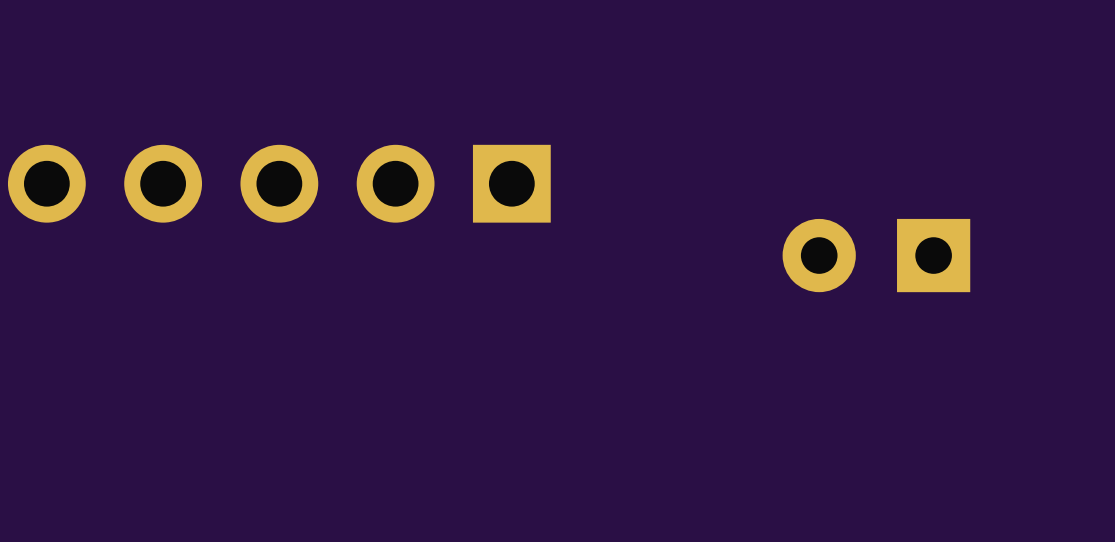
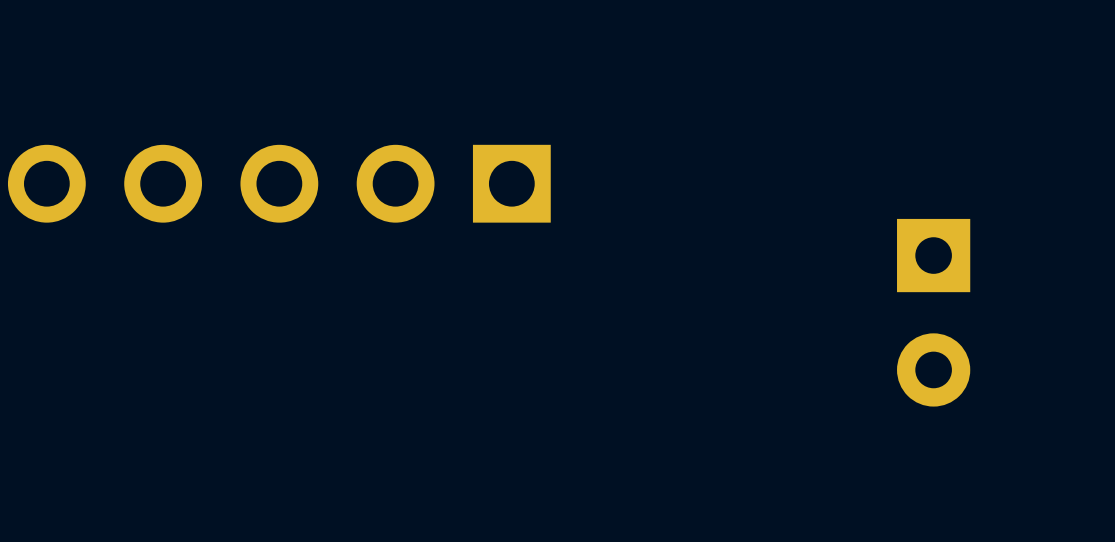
part rotation: 0° (876, 255) -> 90° counterclockwise (933, 312)

